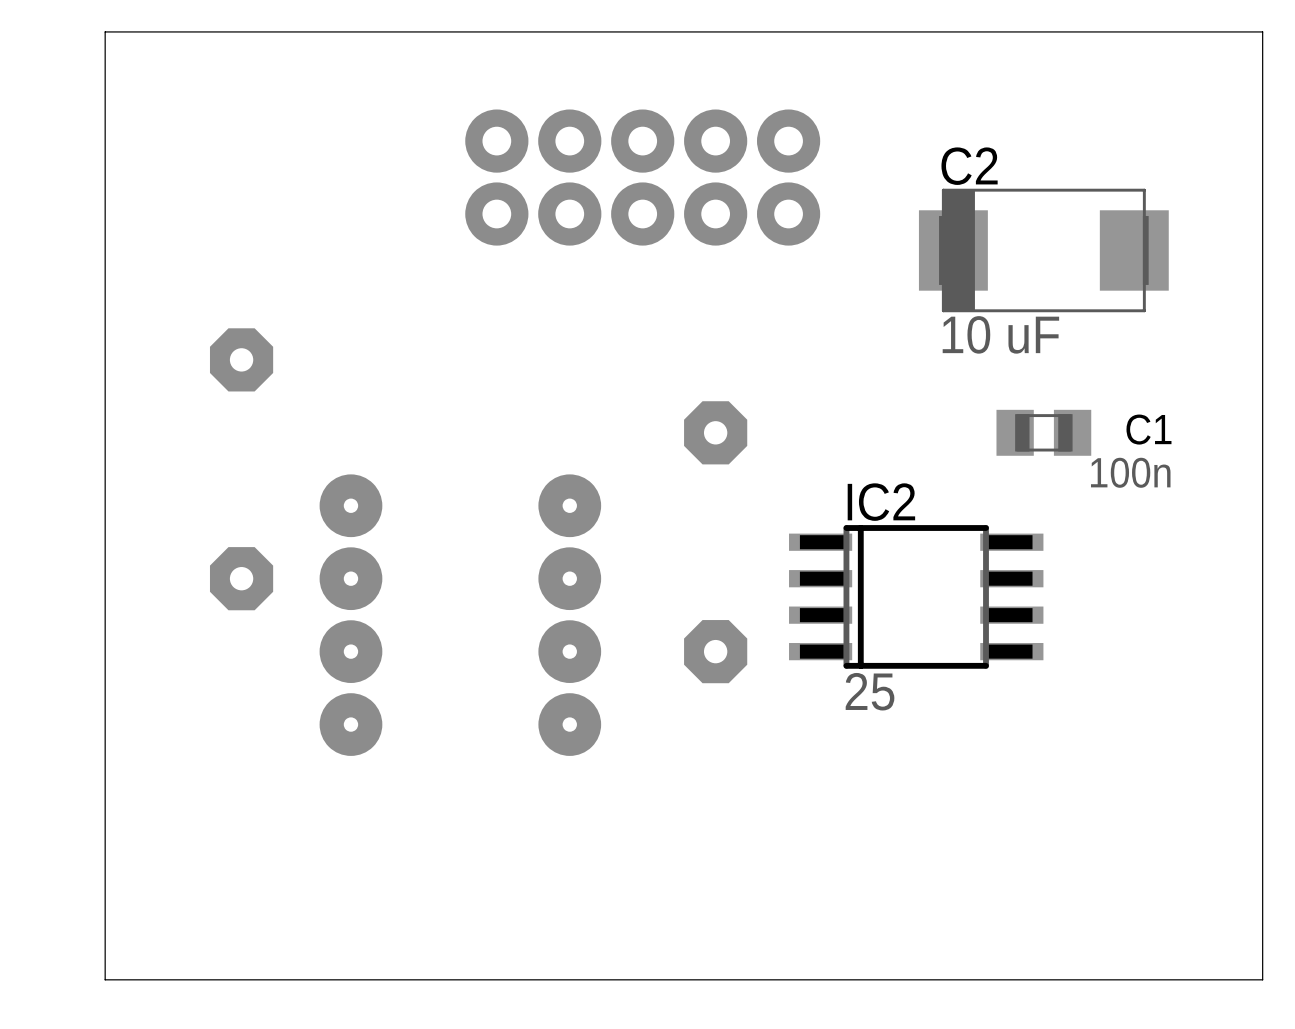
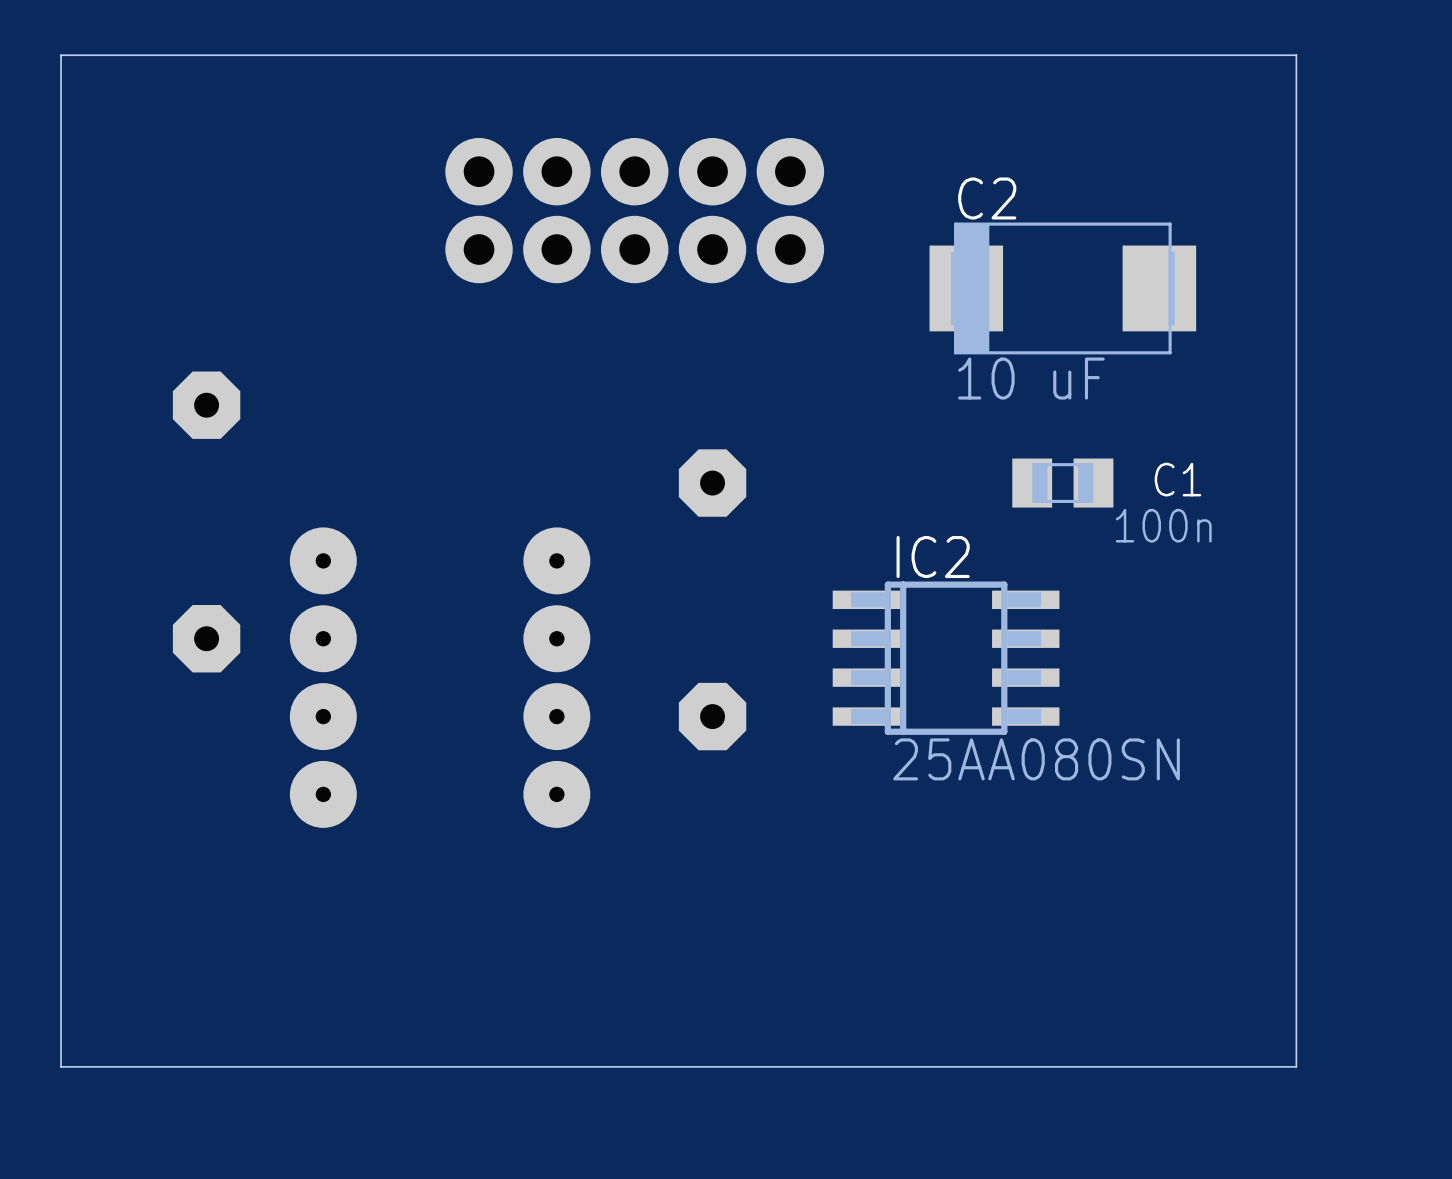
IC2 footprint: [789, 525, 1044, 669] -> [832, 581, 1060, 735]
IC2 value: 25 (870, 691) -> 25AA080SN (1036, 759)

